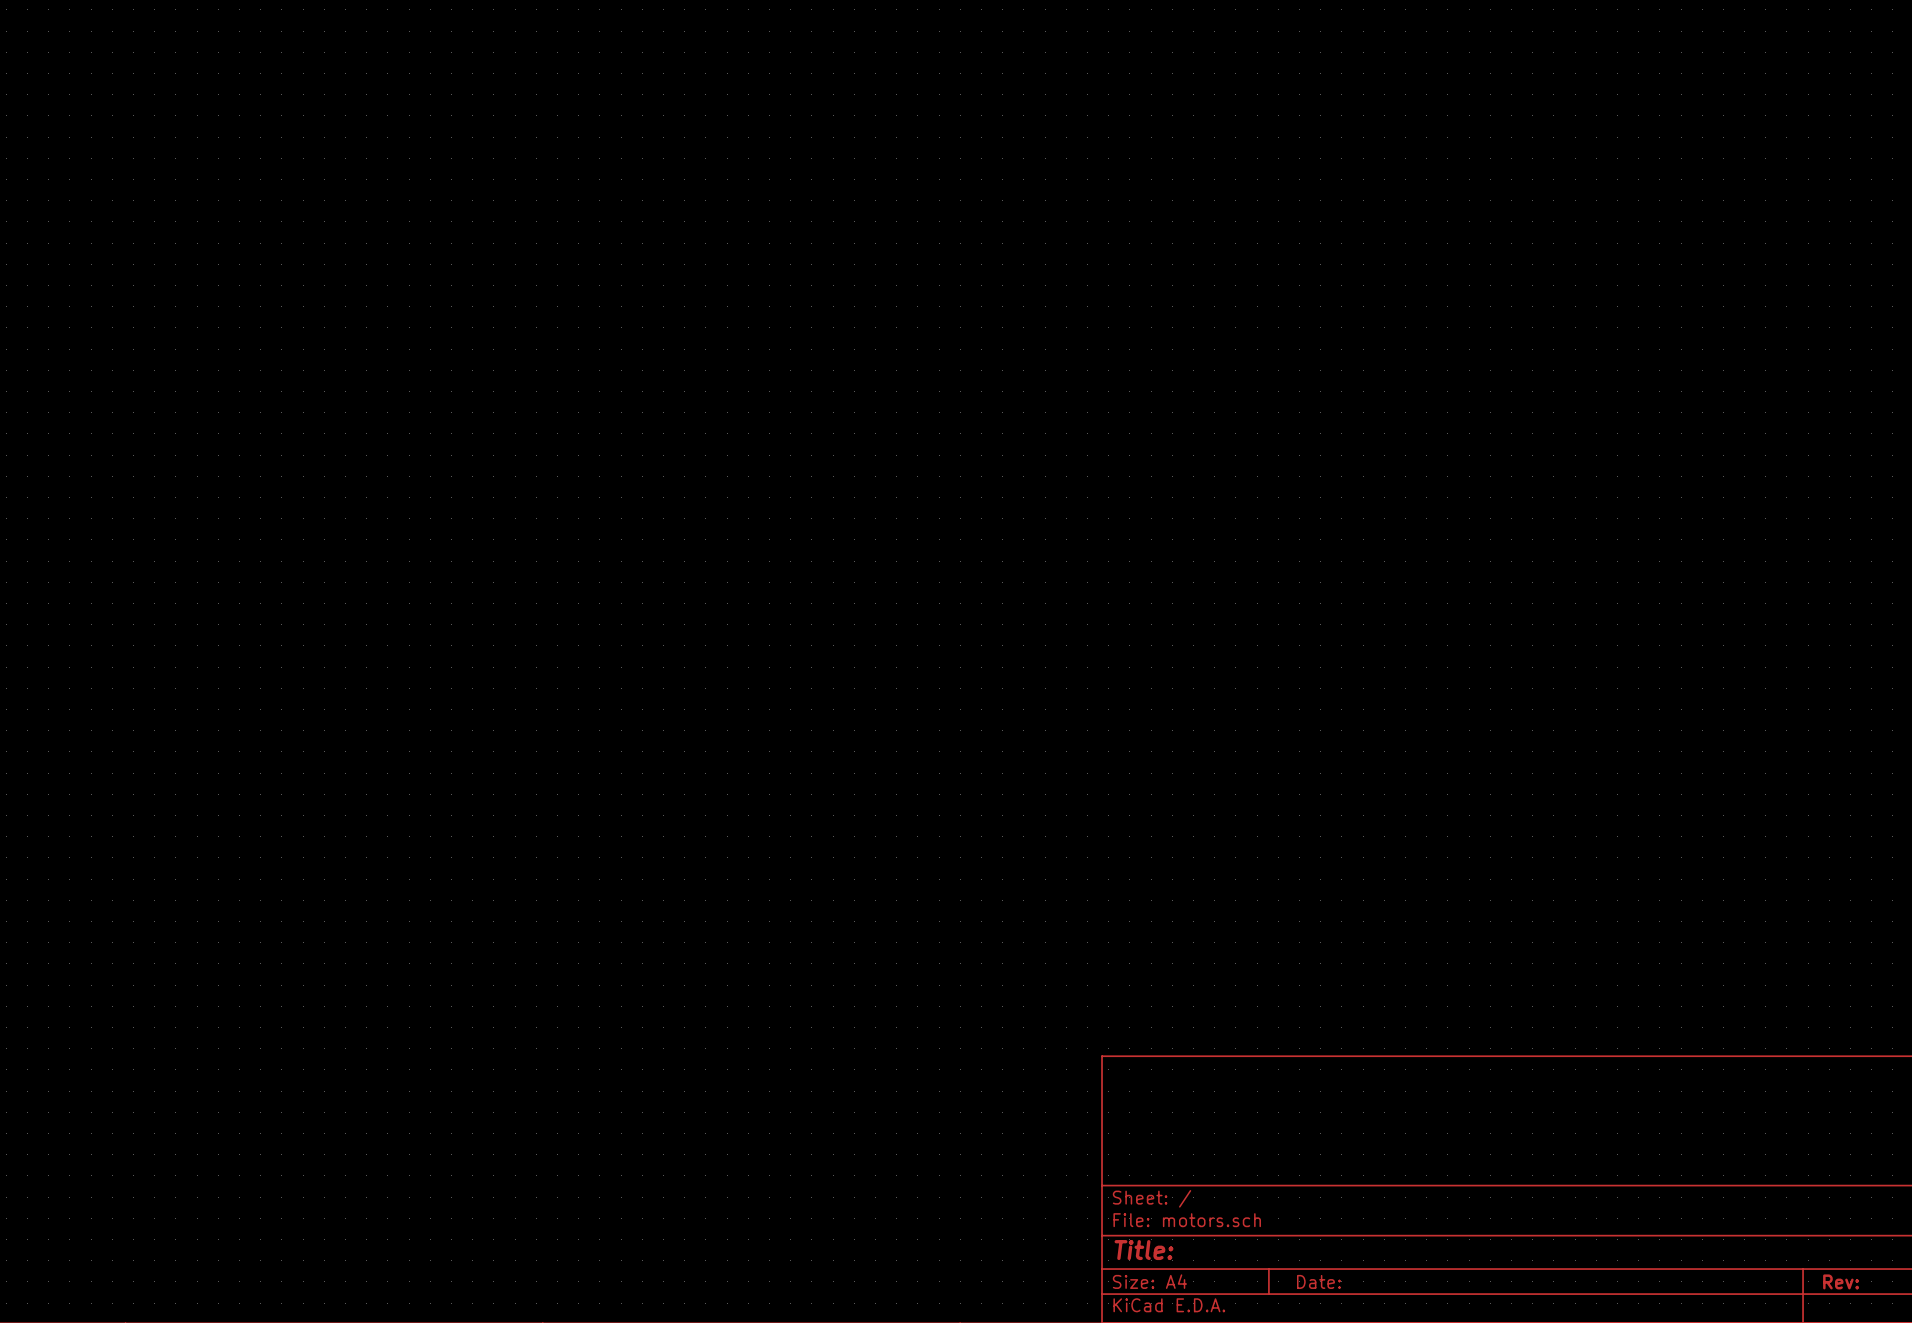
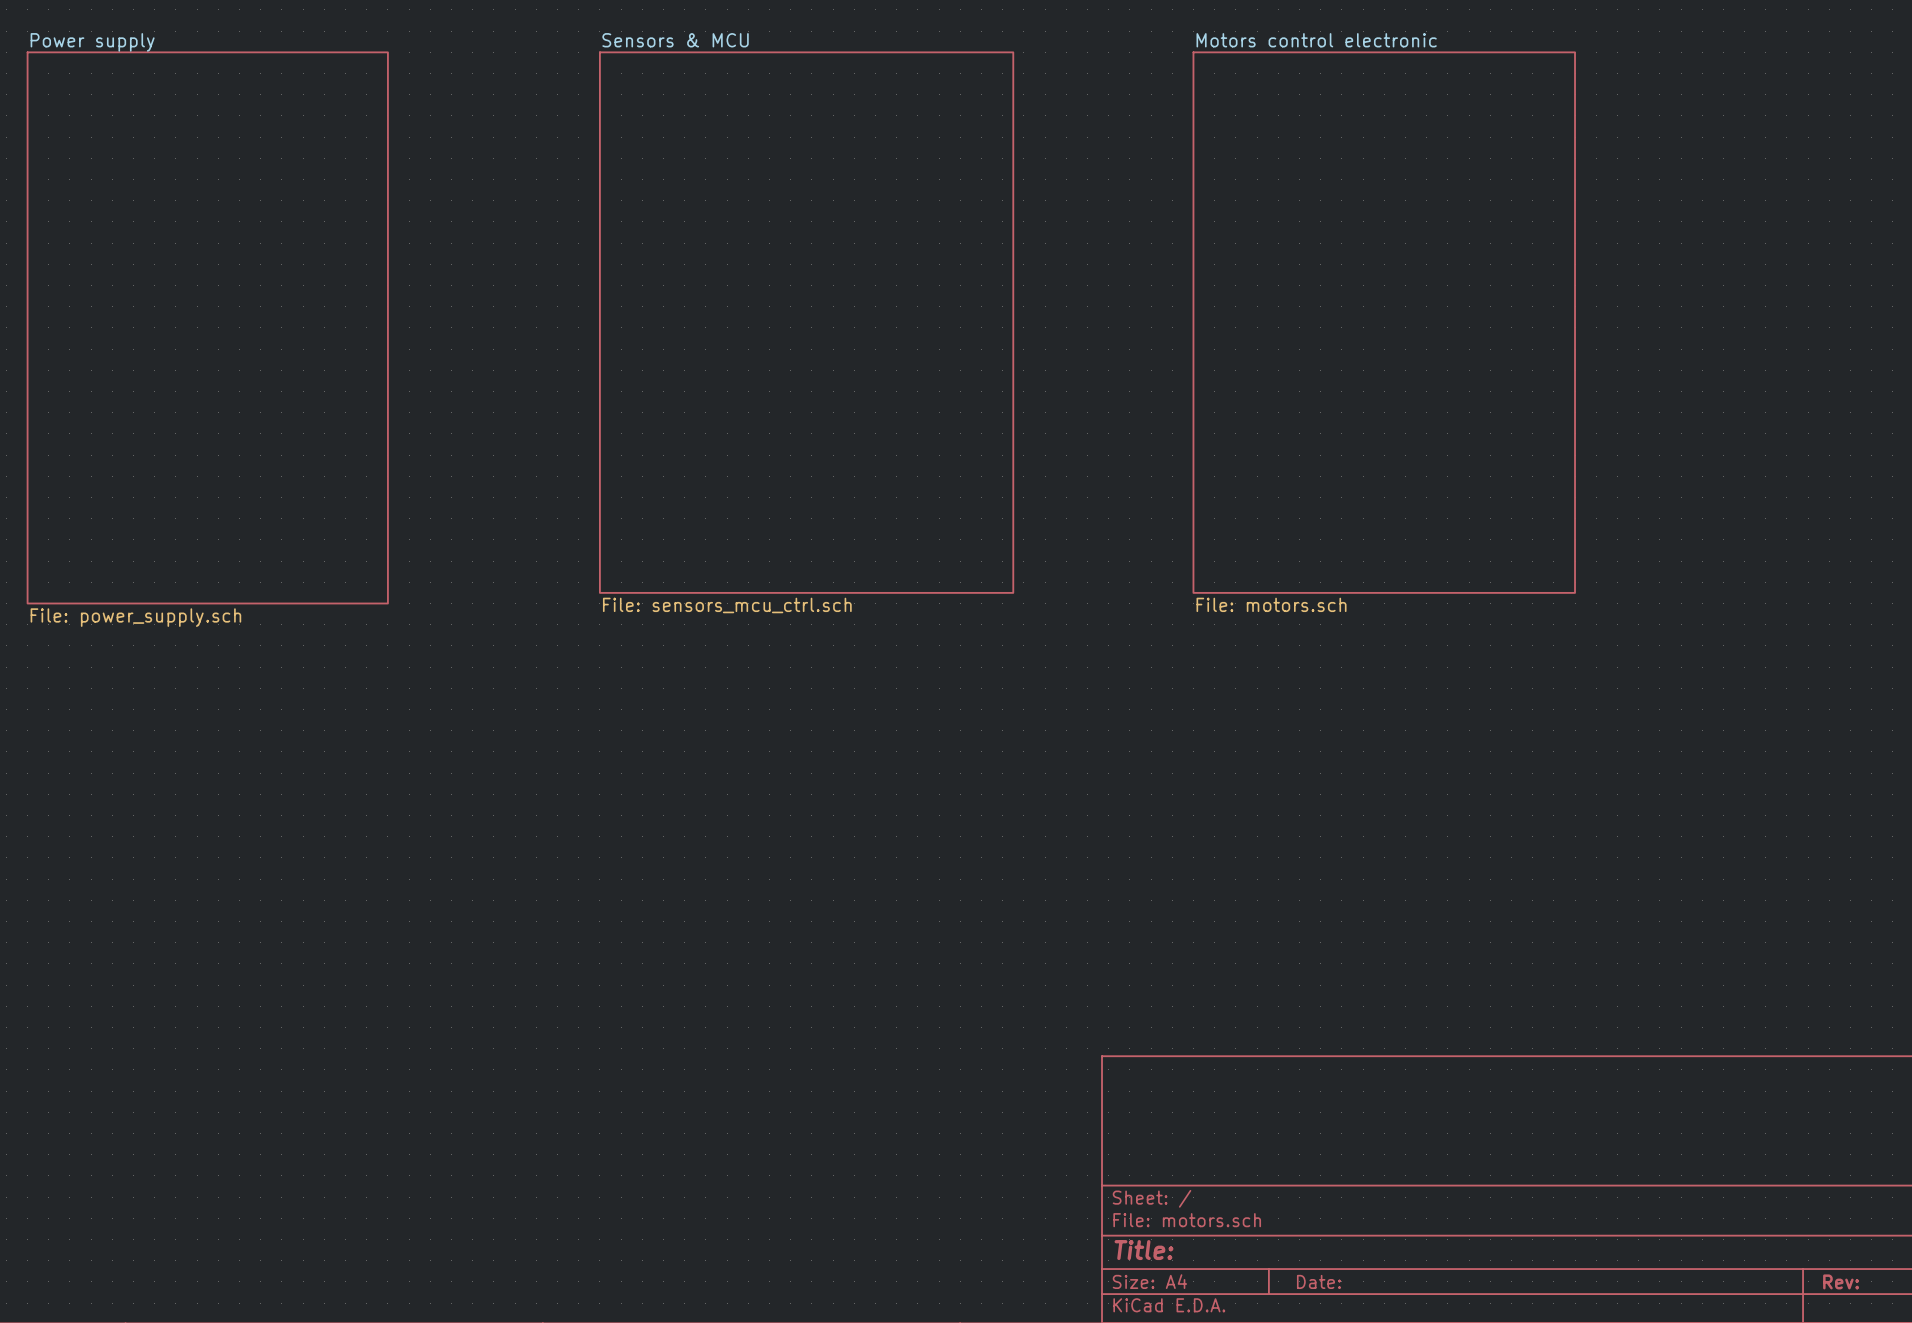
sheet Sensors & MCU: none -> File: sensors_mcu_ctrl.sch (806, 322)
sheet Motors control electronic: none -> File: motors.sch (1384, 322)
sheet Power supply: none -> File: power_supply.sch (207, 327)

